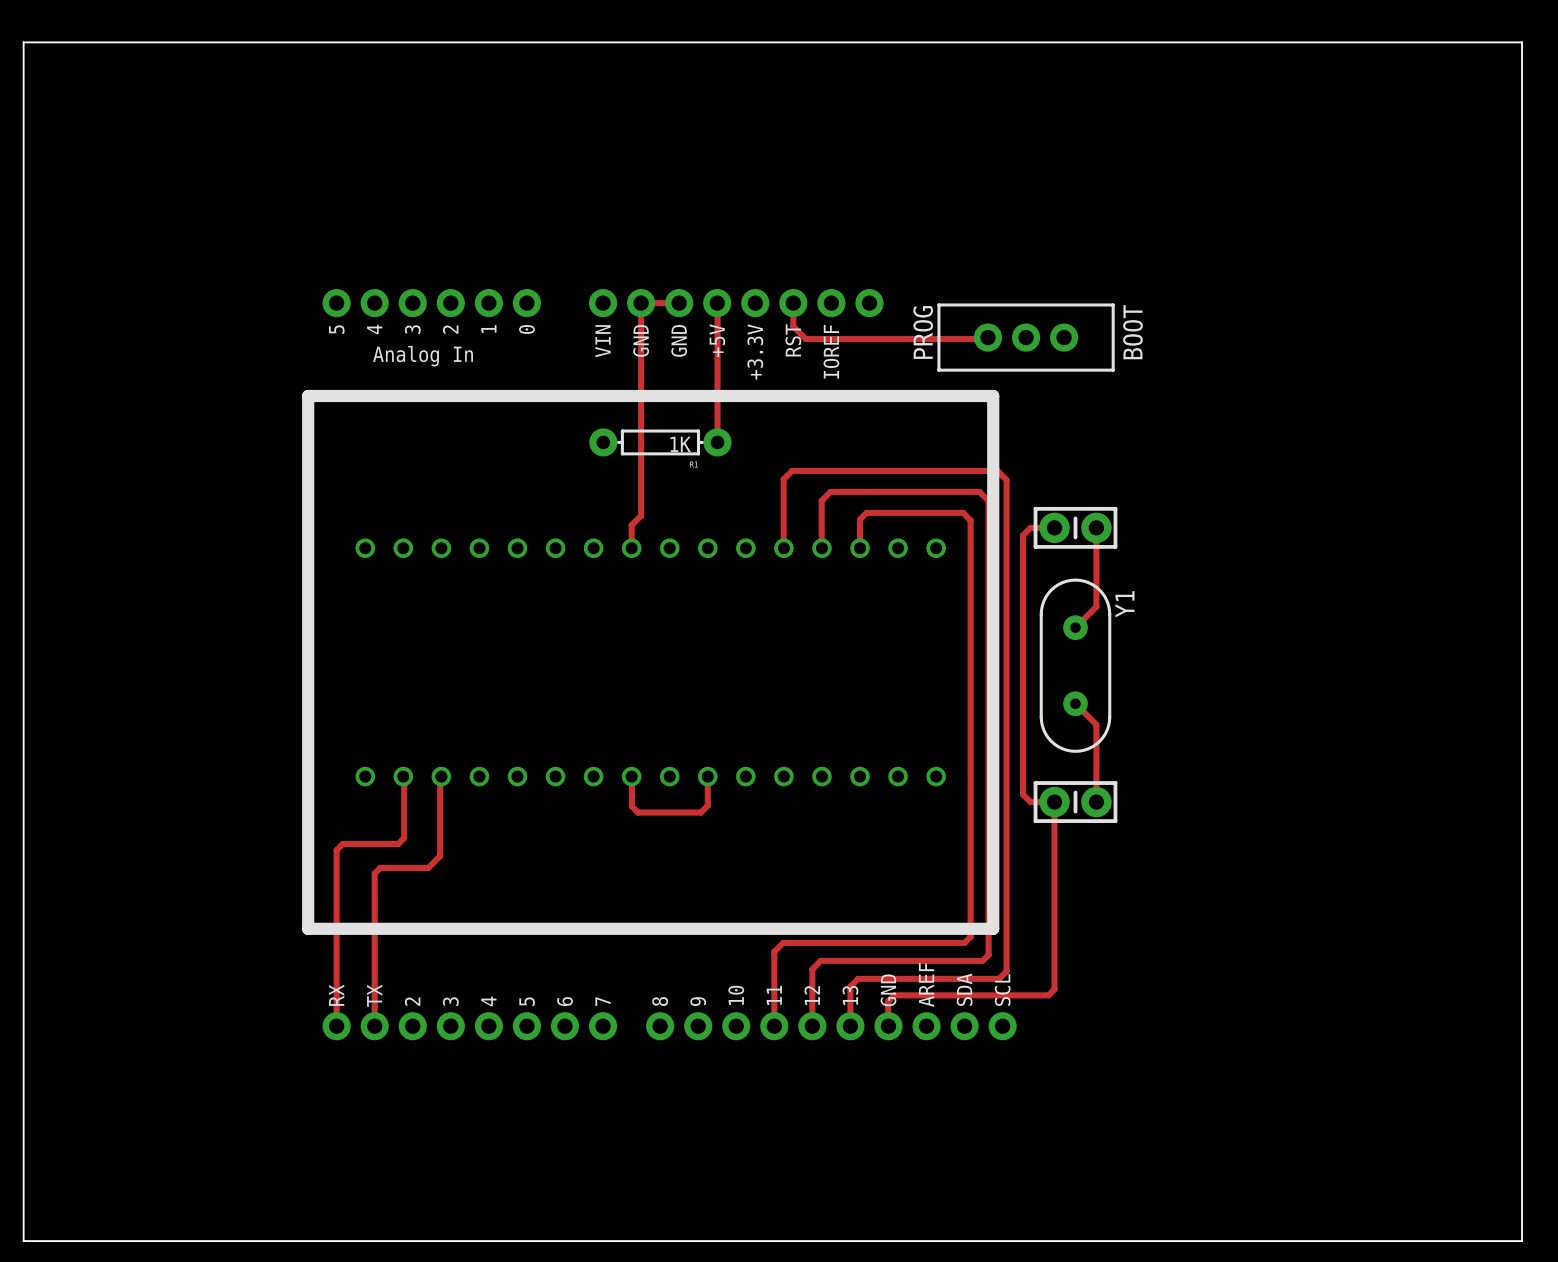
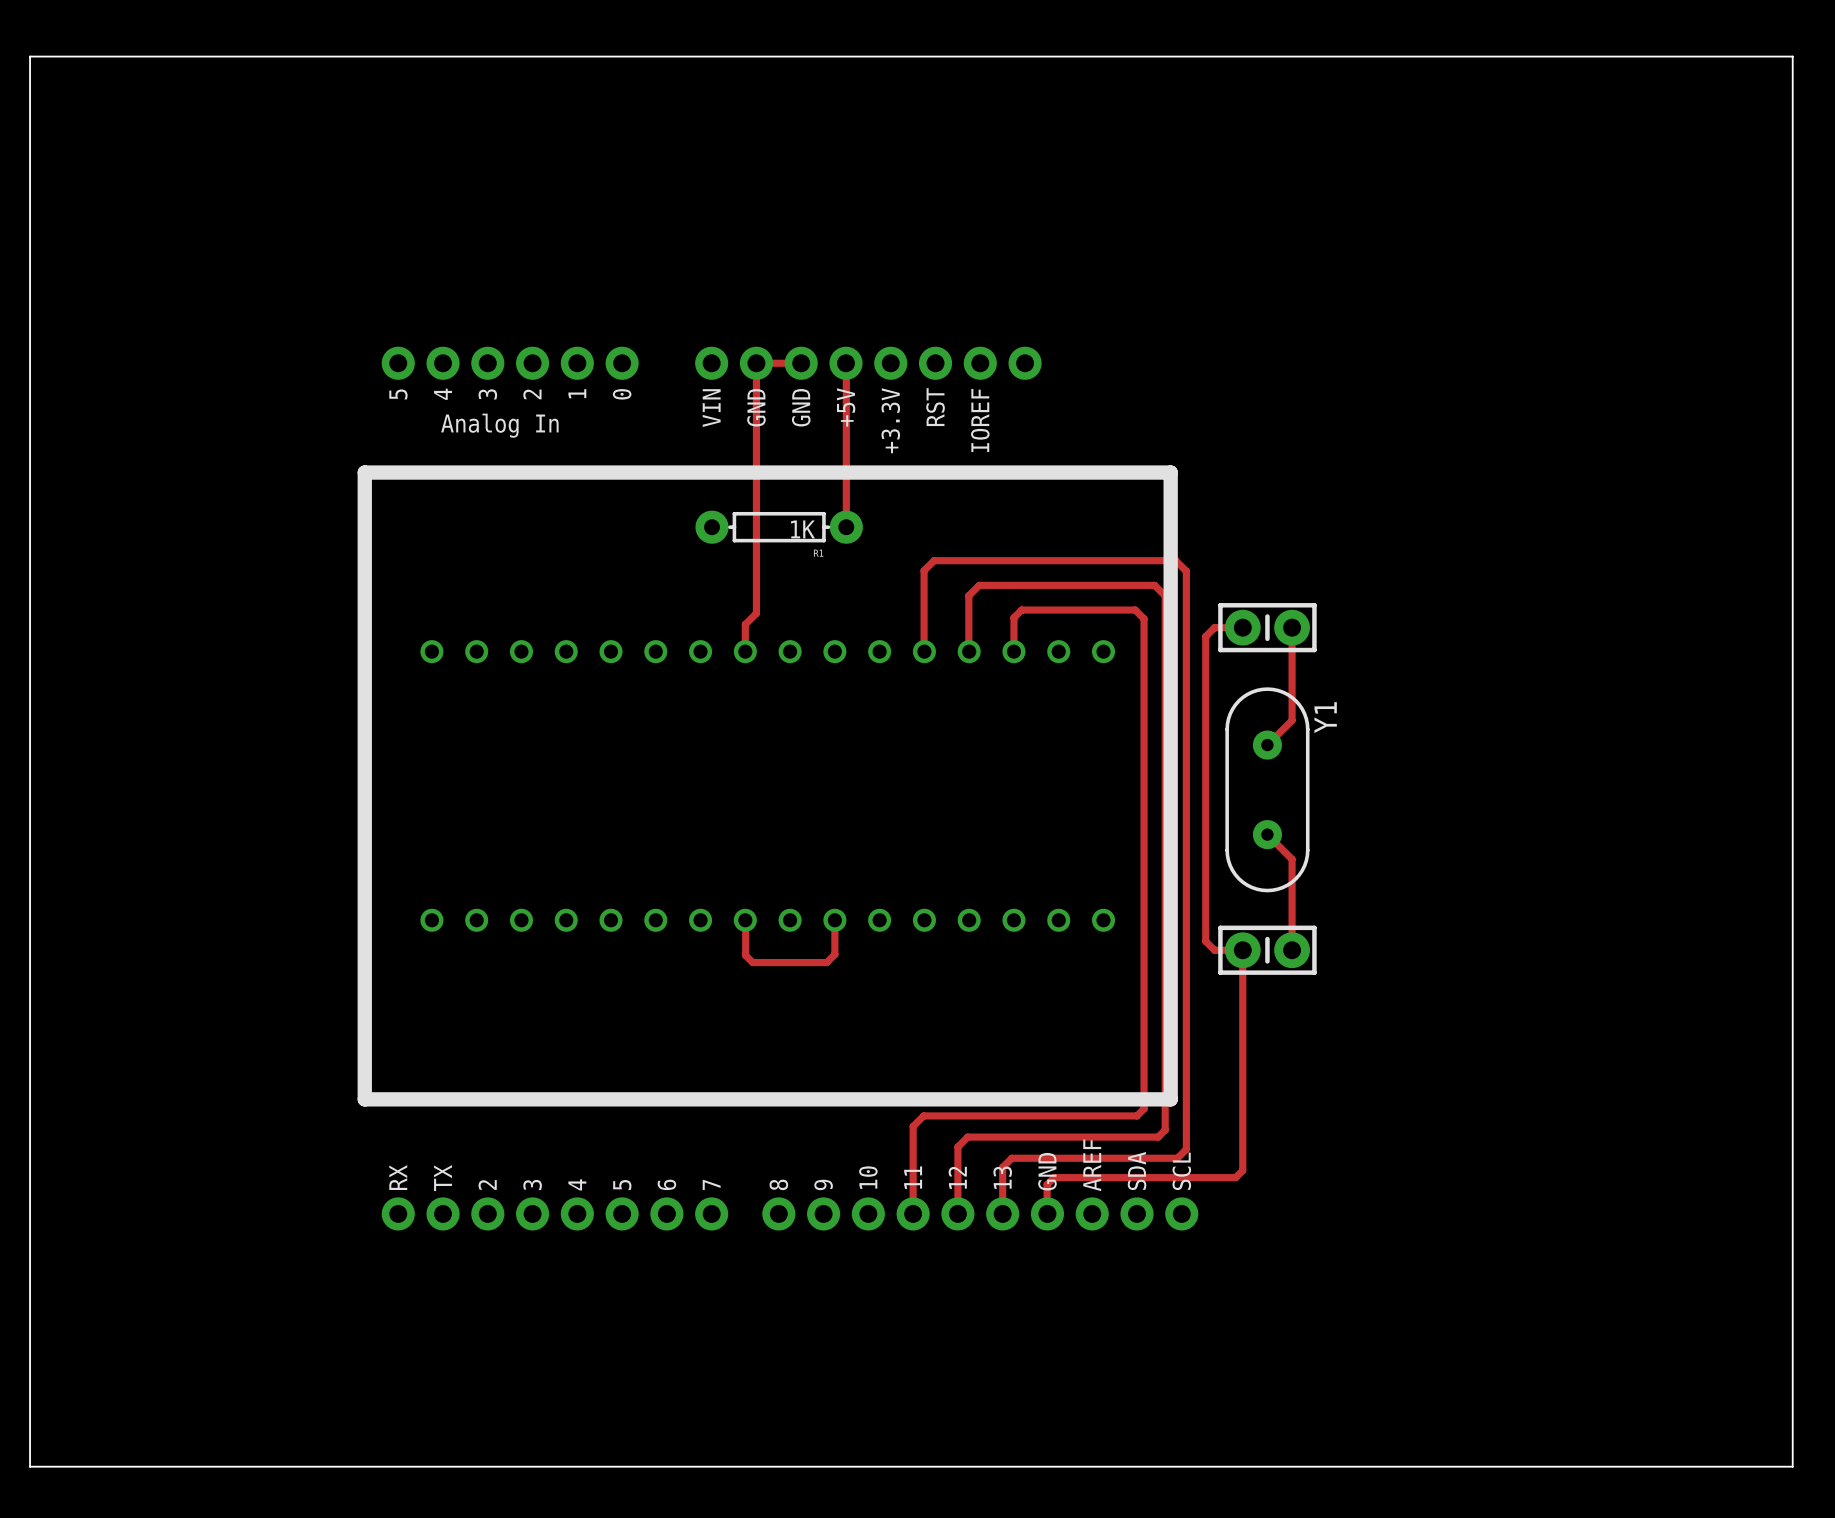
track: (793, 303) (793, 326) (805, 339) (987, 337) -> none
text: PROG (923, 332) -> none
text: BOOT (1132, 332) -> none
part: (1026, 337) -> none
track: (403, 776) (404, 838) (398, 844) (342, 844) (336, 850) (336, 1026) -> none
track: (441, 776) (440, 856) (428, 867) (380, 867) (374, 873) (374, 1026) -> none

